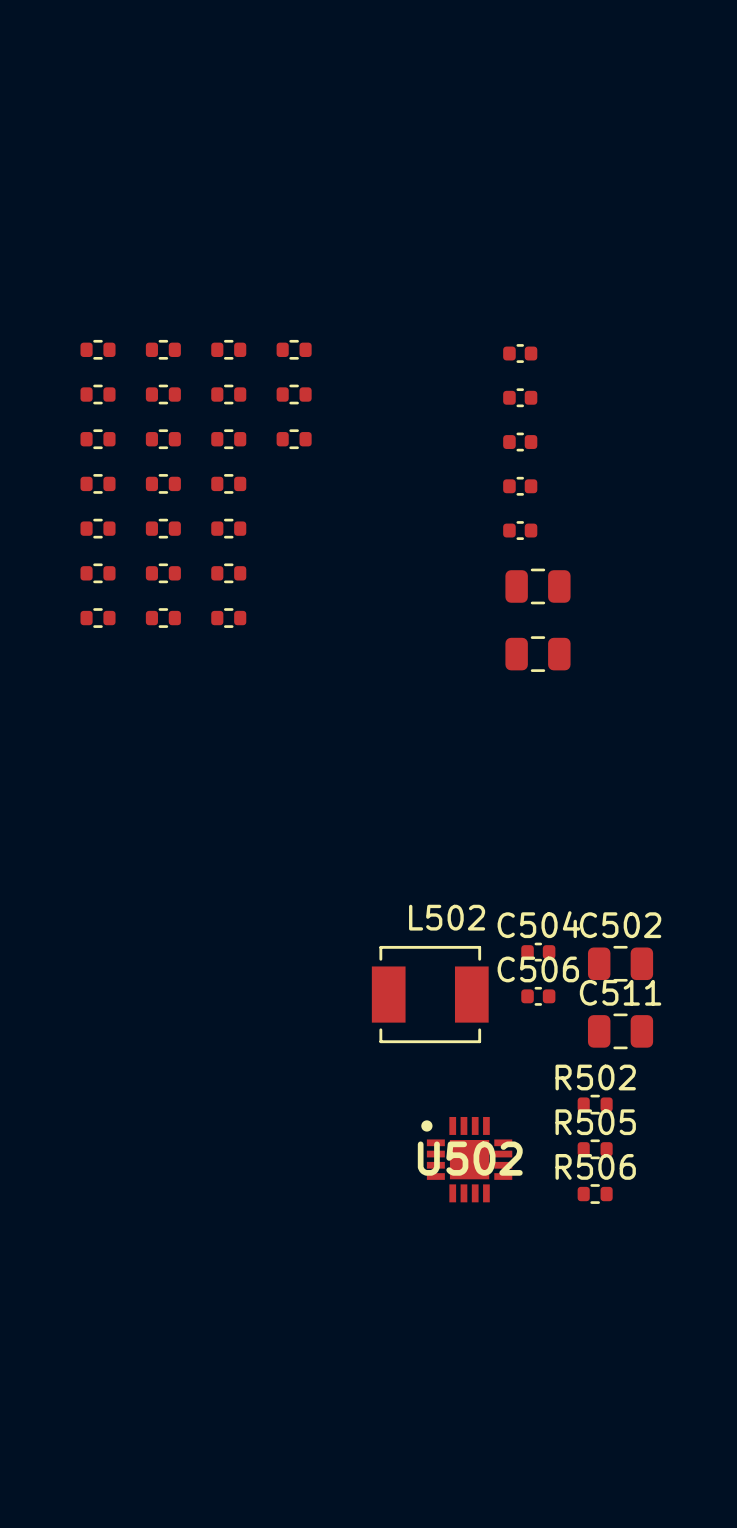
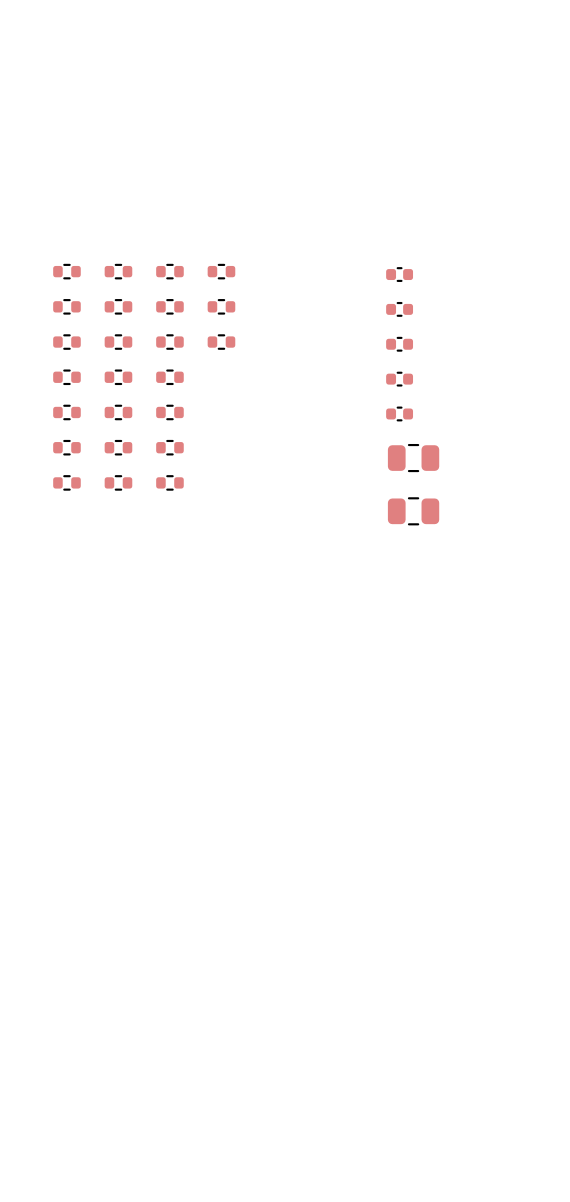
C504: (538, 952) -> none
C502: (620, 963) -> none
L502: (430, 994) -> none
C506: (538, 996) -> none
C511: (620, 1031) -> none
R502: (595, 1104) -> none
R505: (595, 1149) -> none
U502: (466, 1159) -> none
R506: (595, 1194) -> none

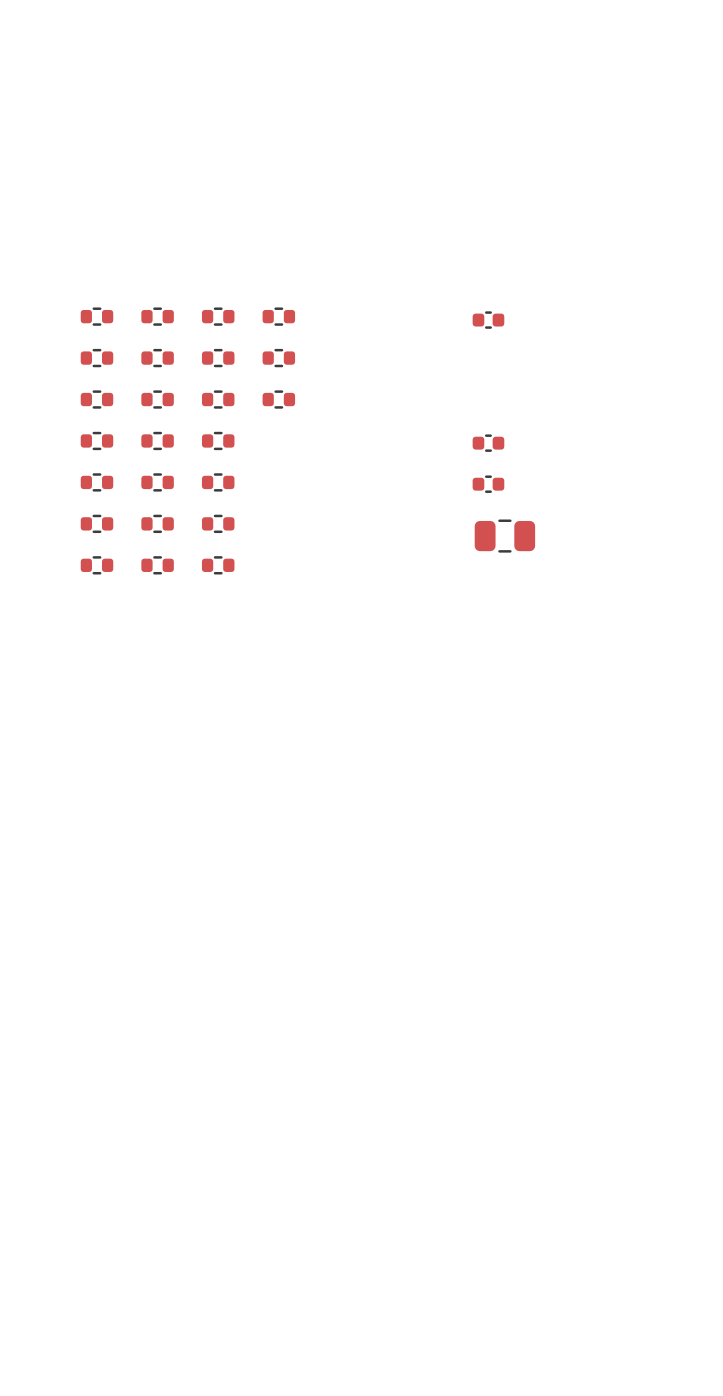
part: (399, 309) -> none
part: (399, 344) -> none
part: (413, 511) -> none

